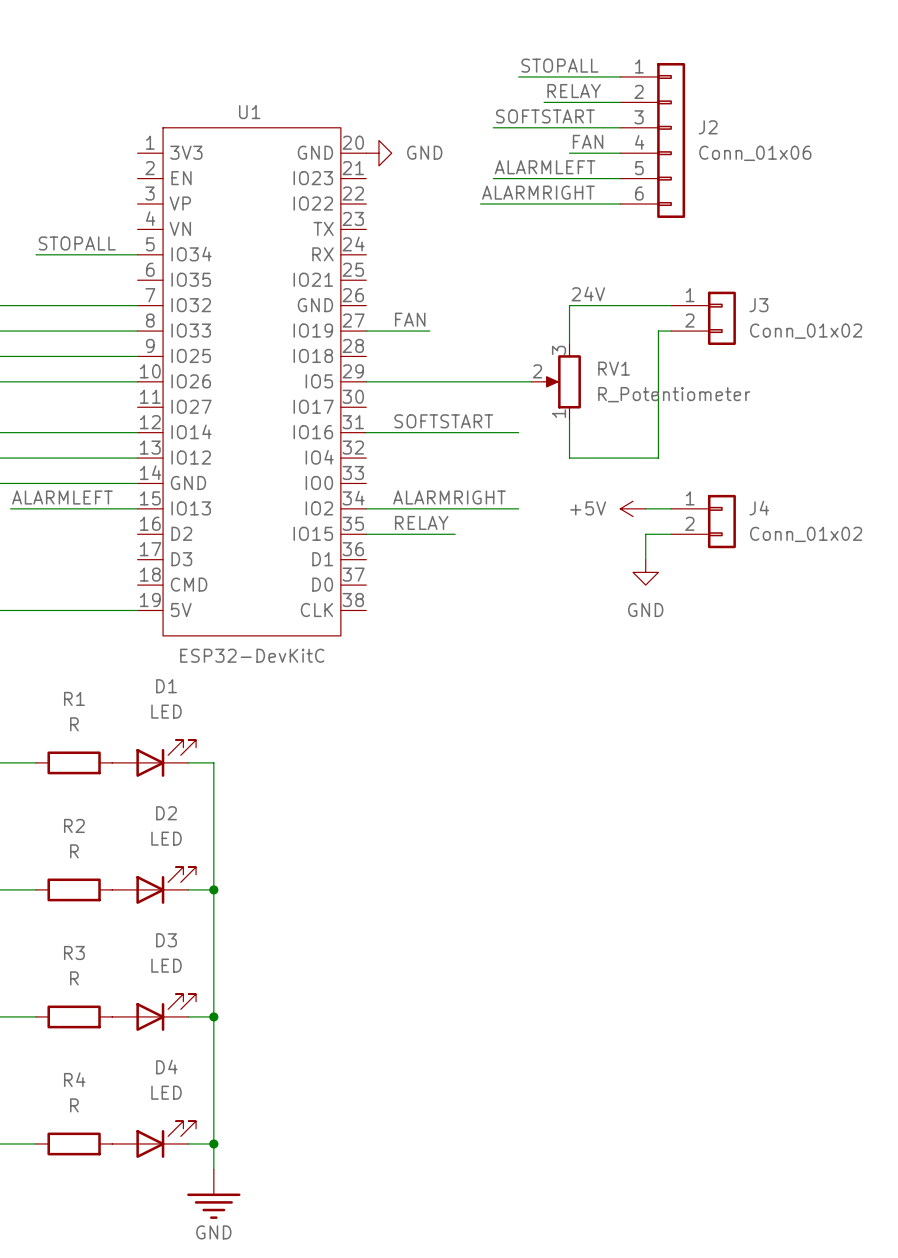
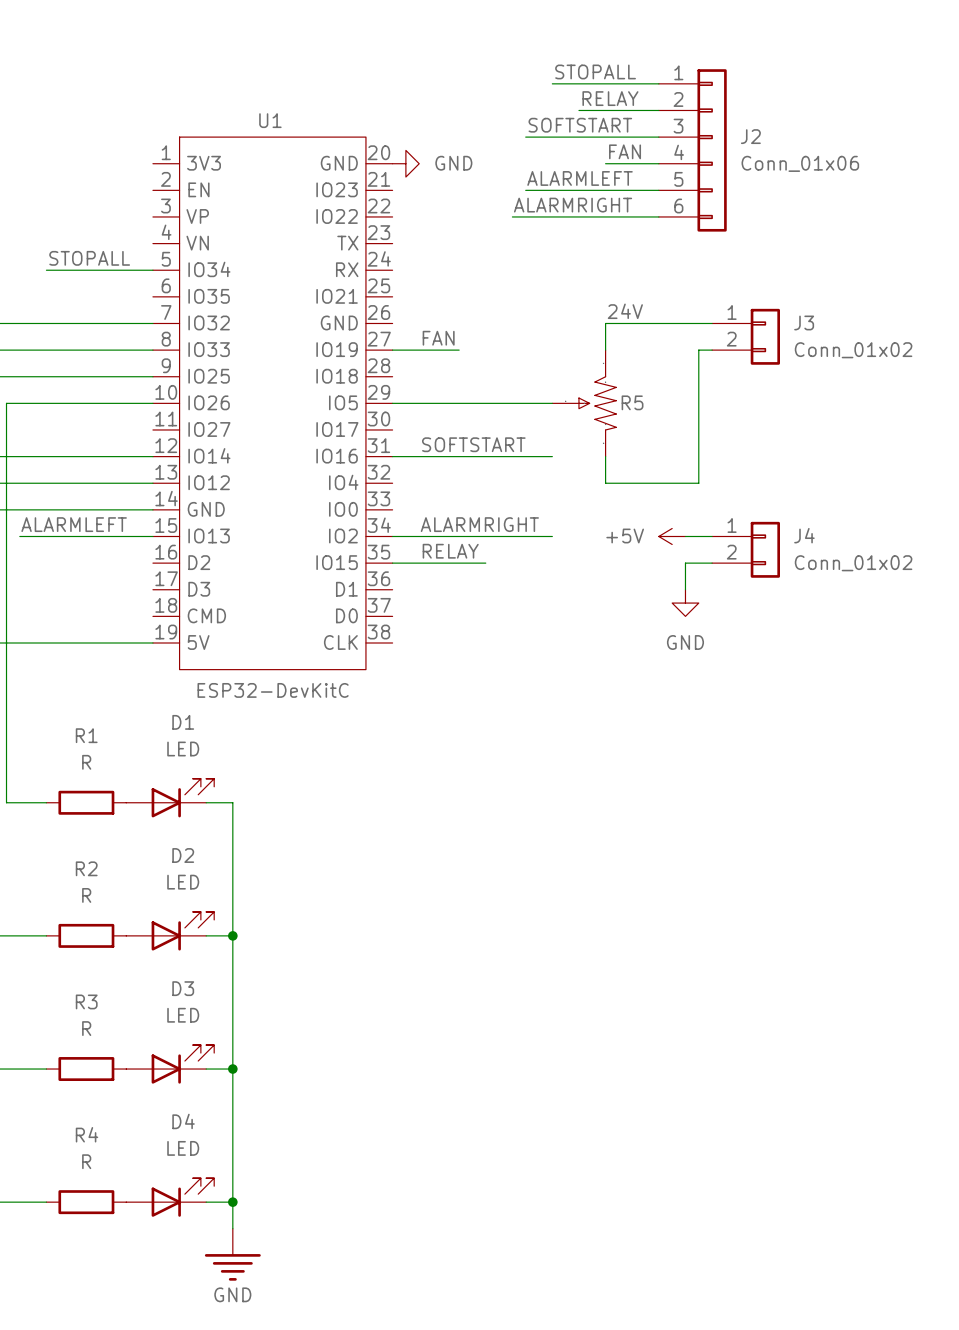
R5: none -> (584, 403)
RV1: R_Potentiometer (556, 381) -> none

